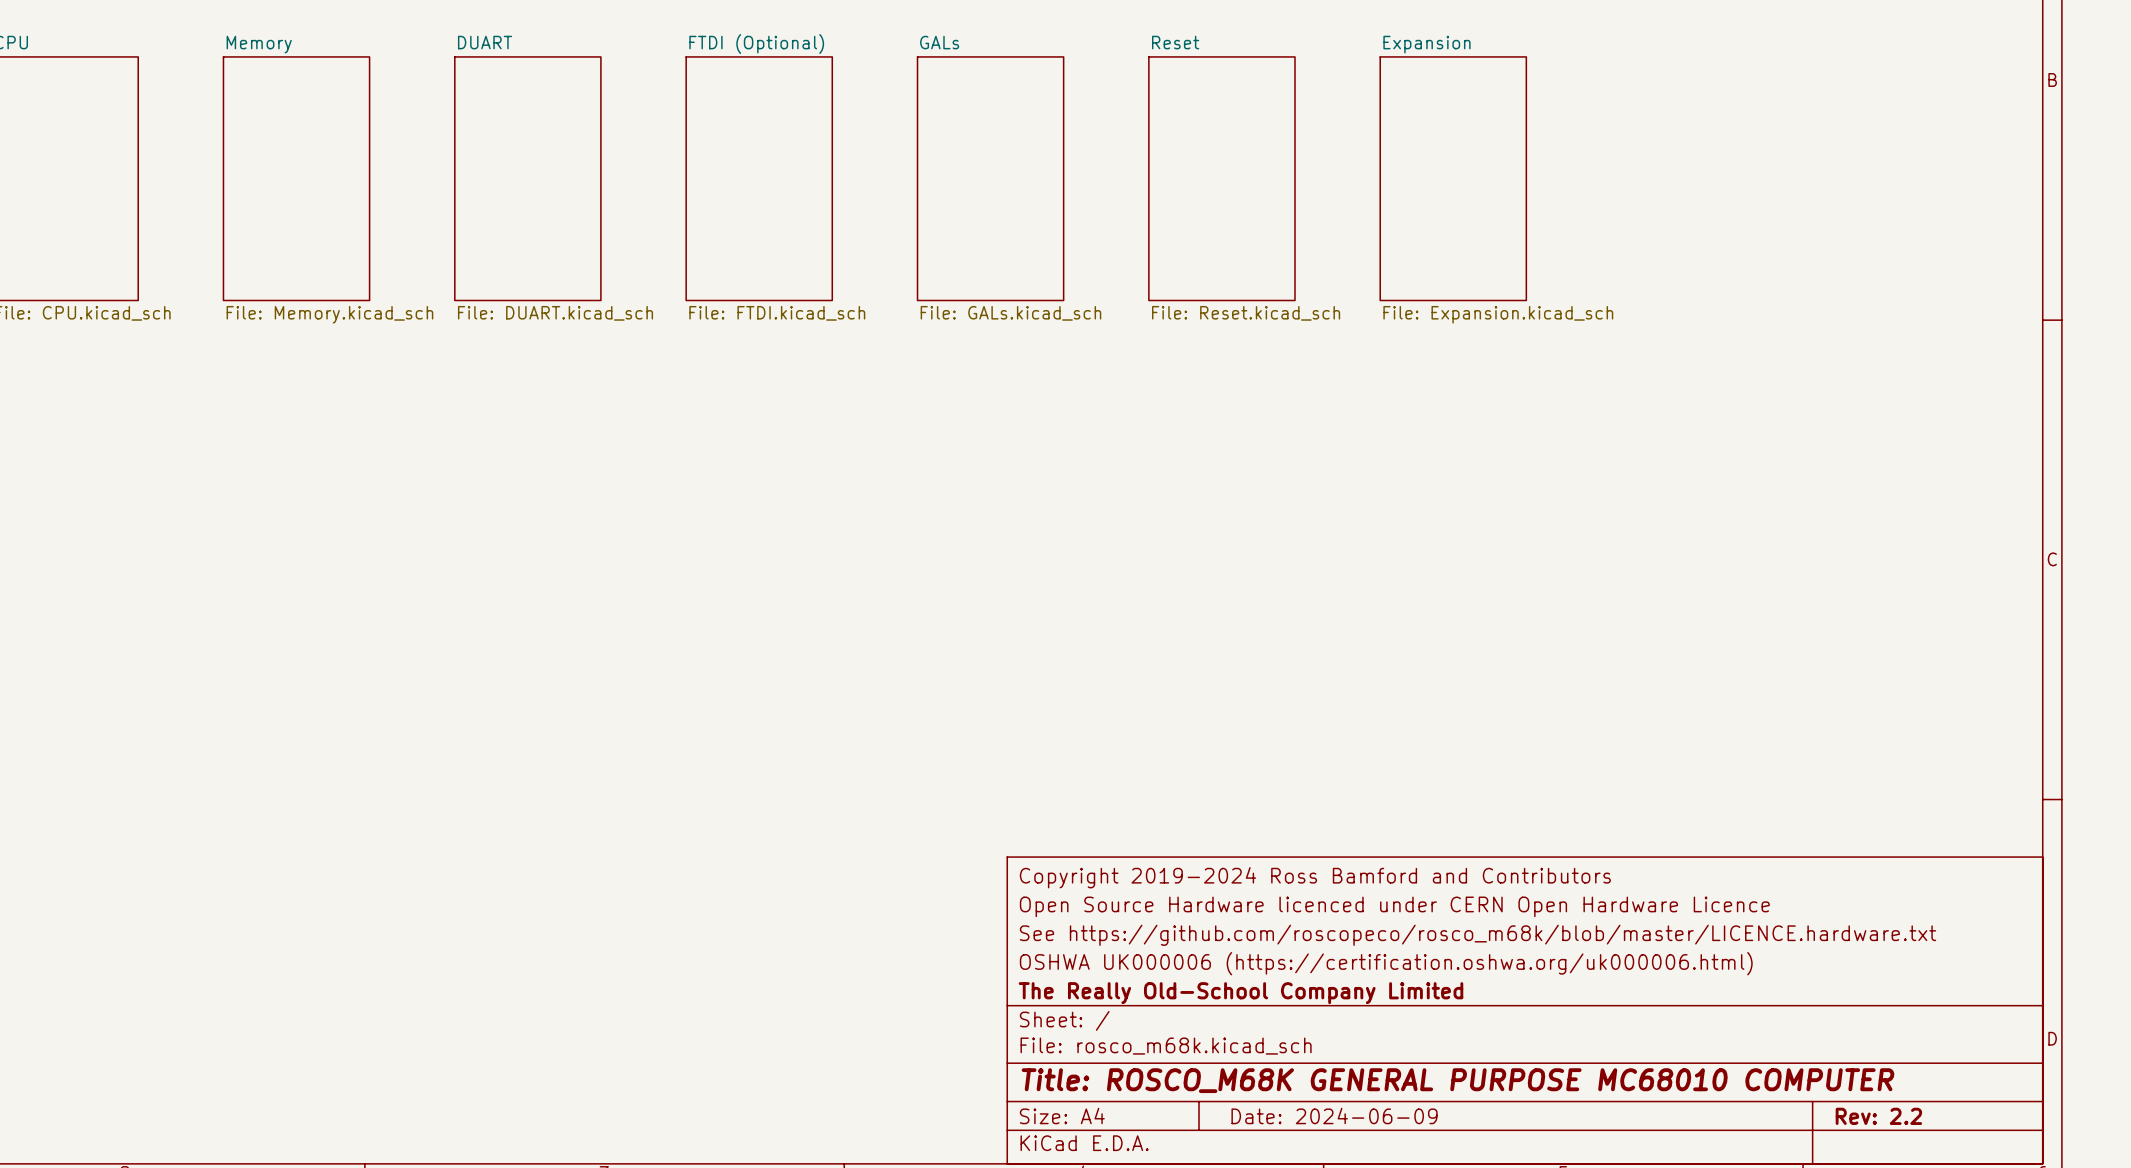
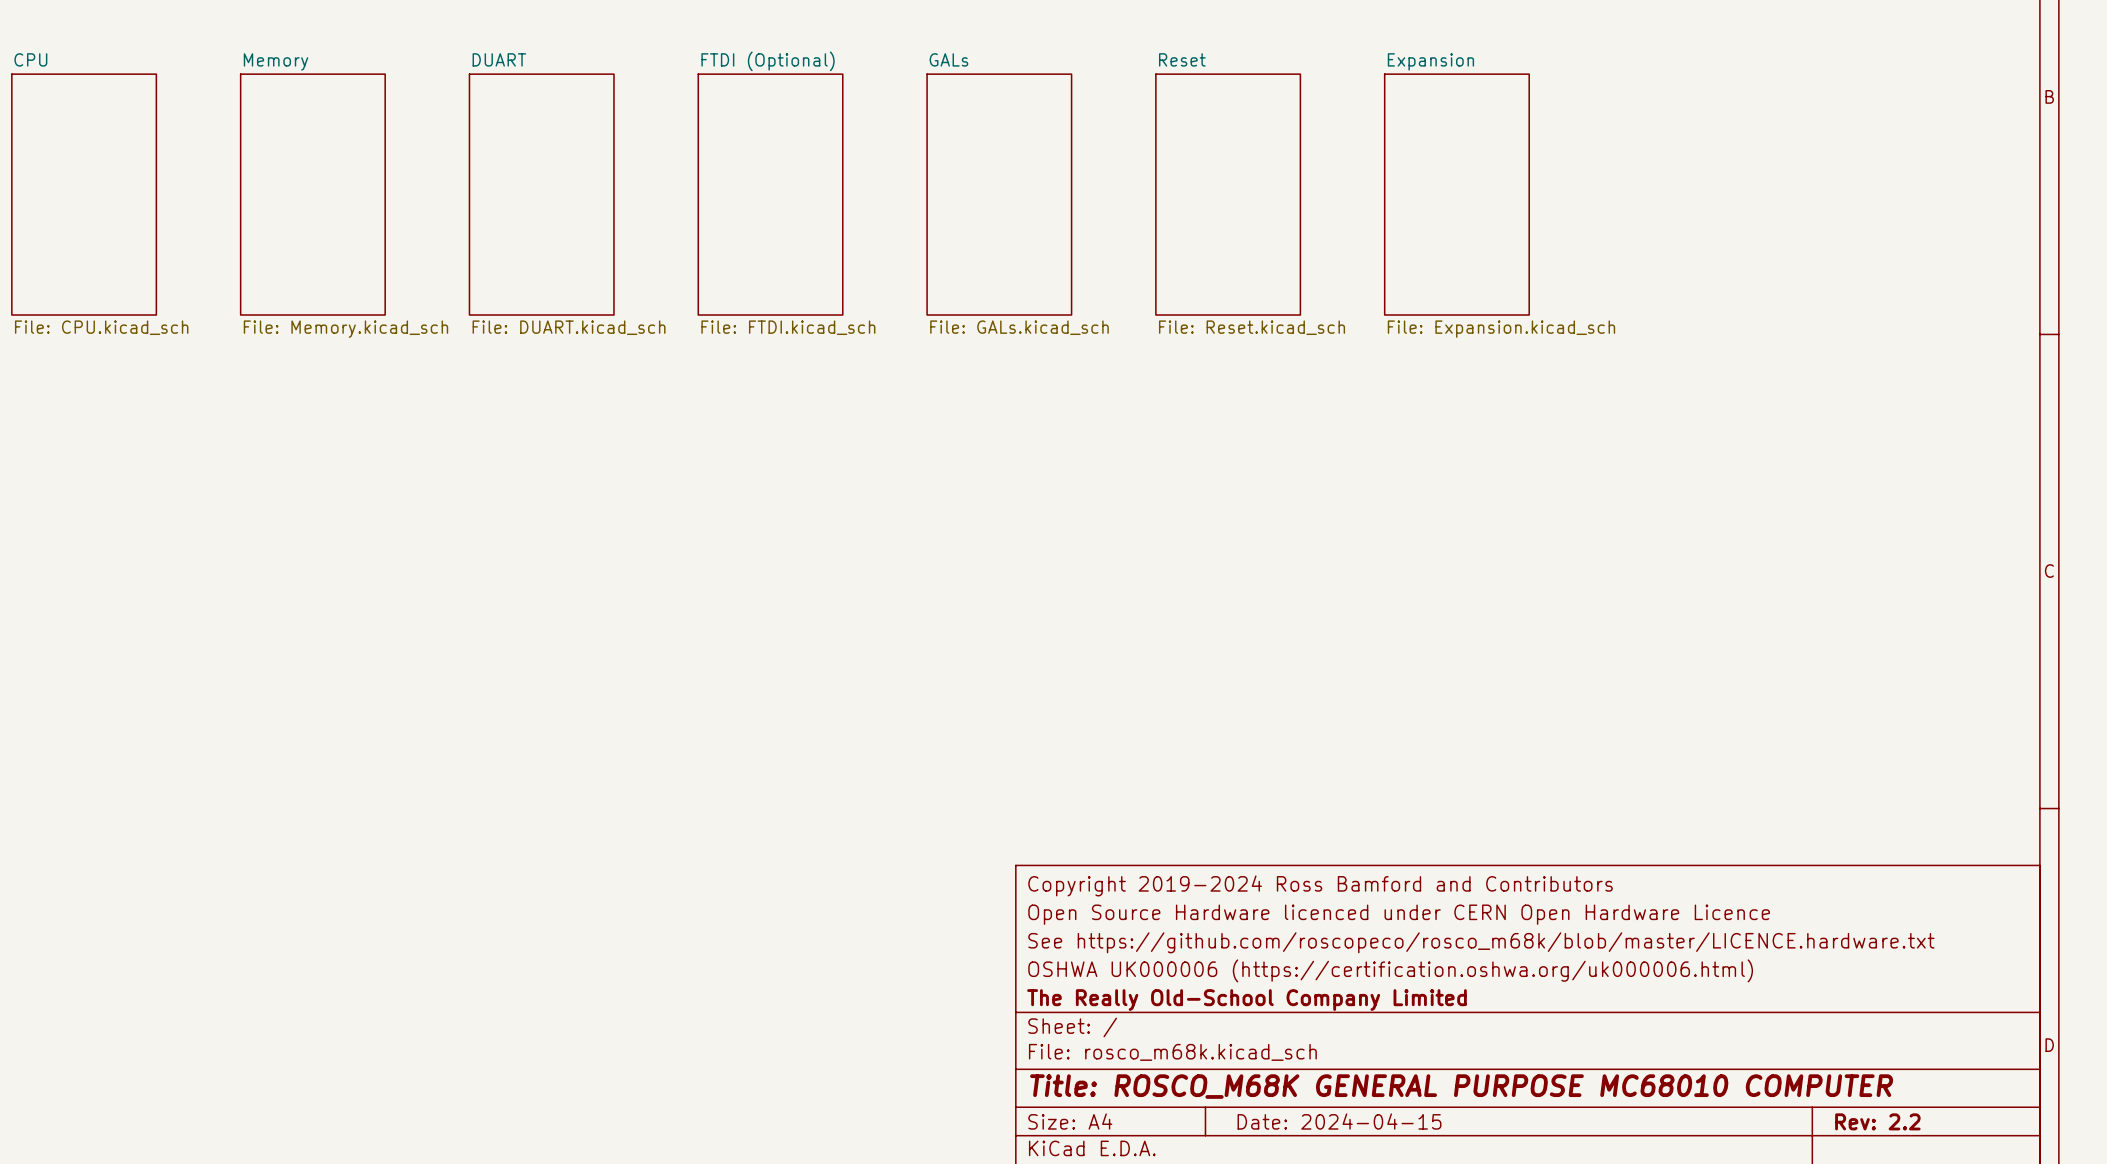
title block: Date: 2024-06-09 (1334, 1116) -> Date: 2024-04-15 (1339, 1121)

